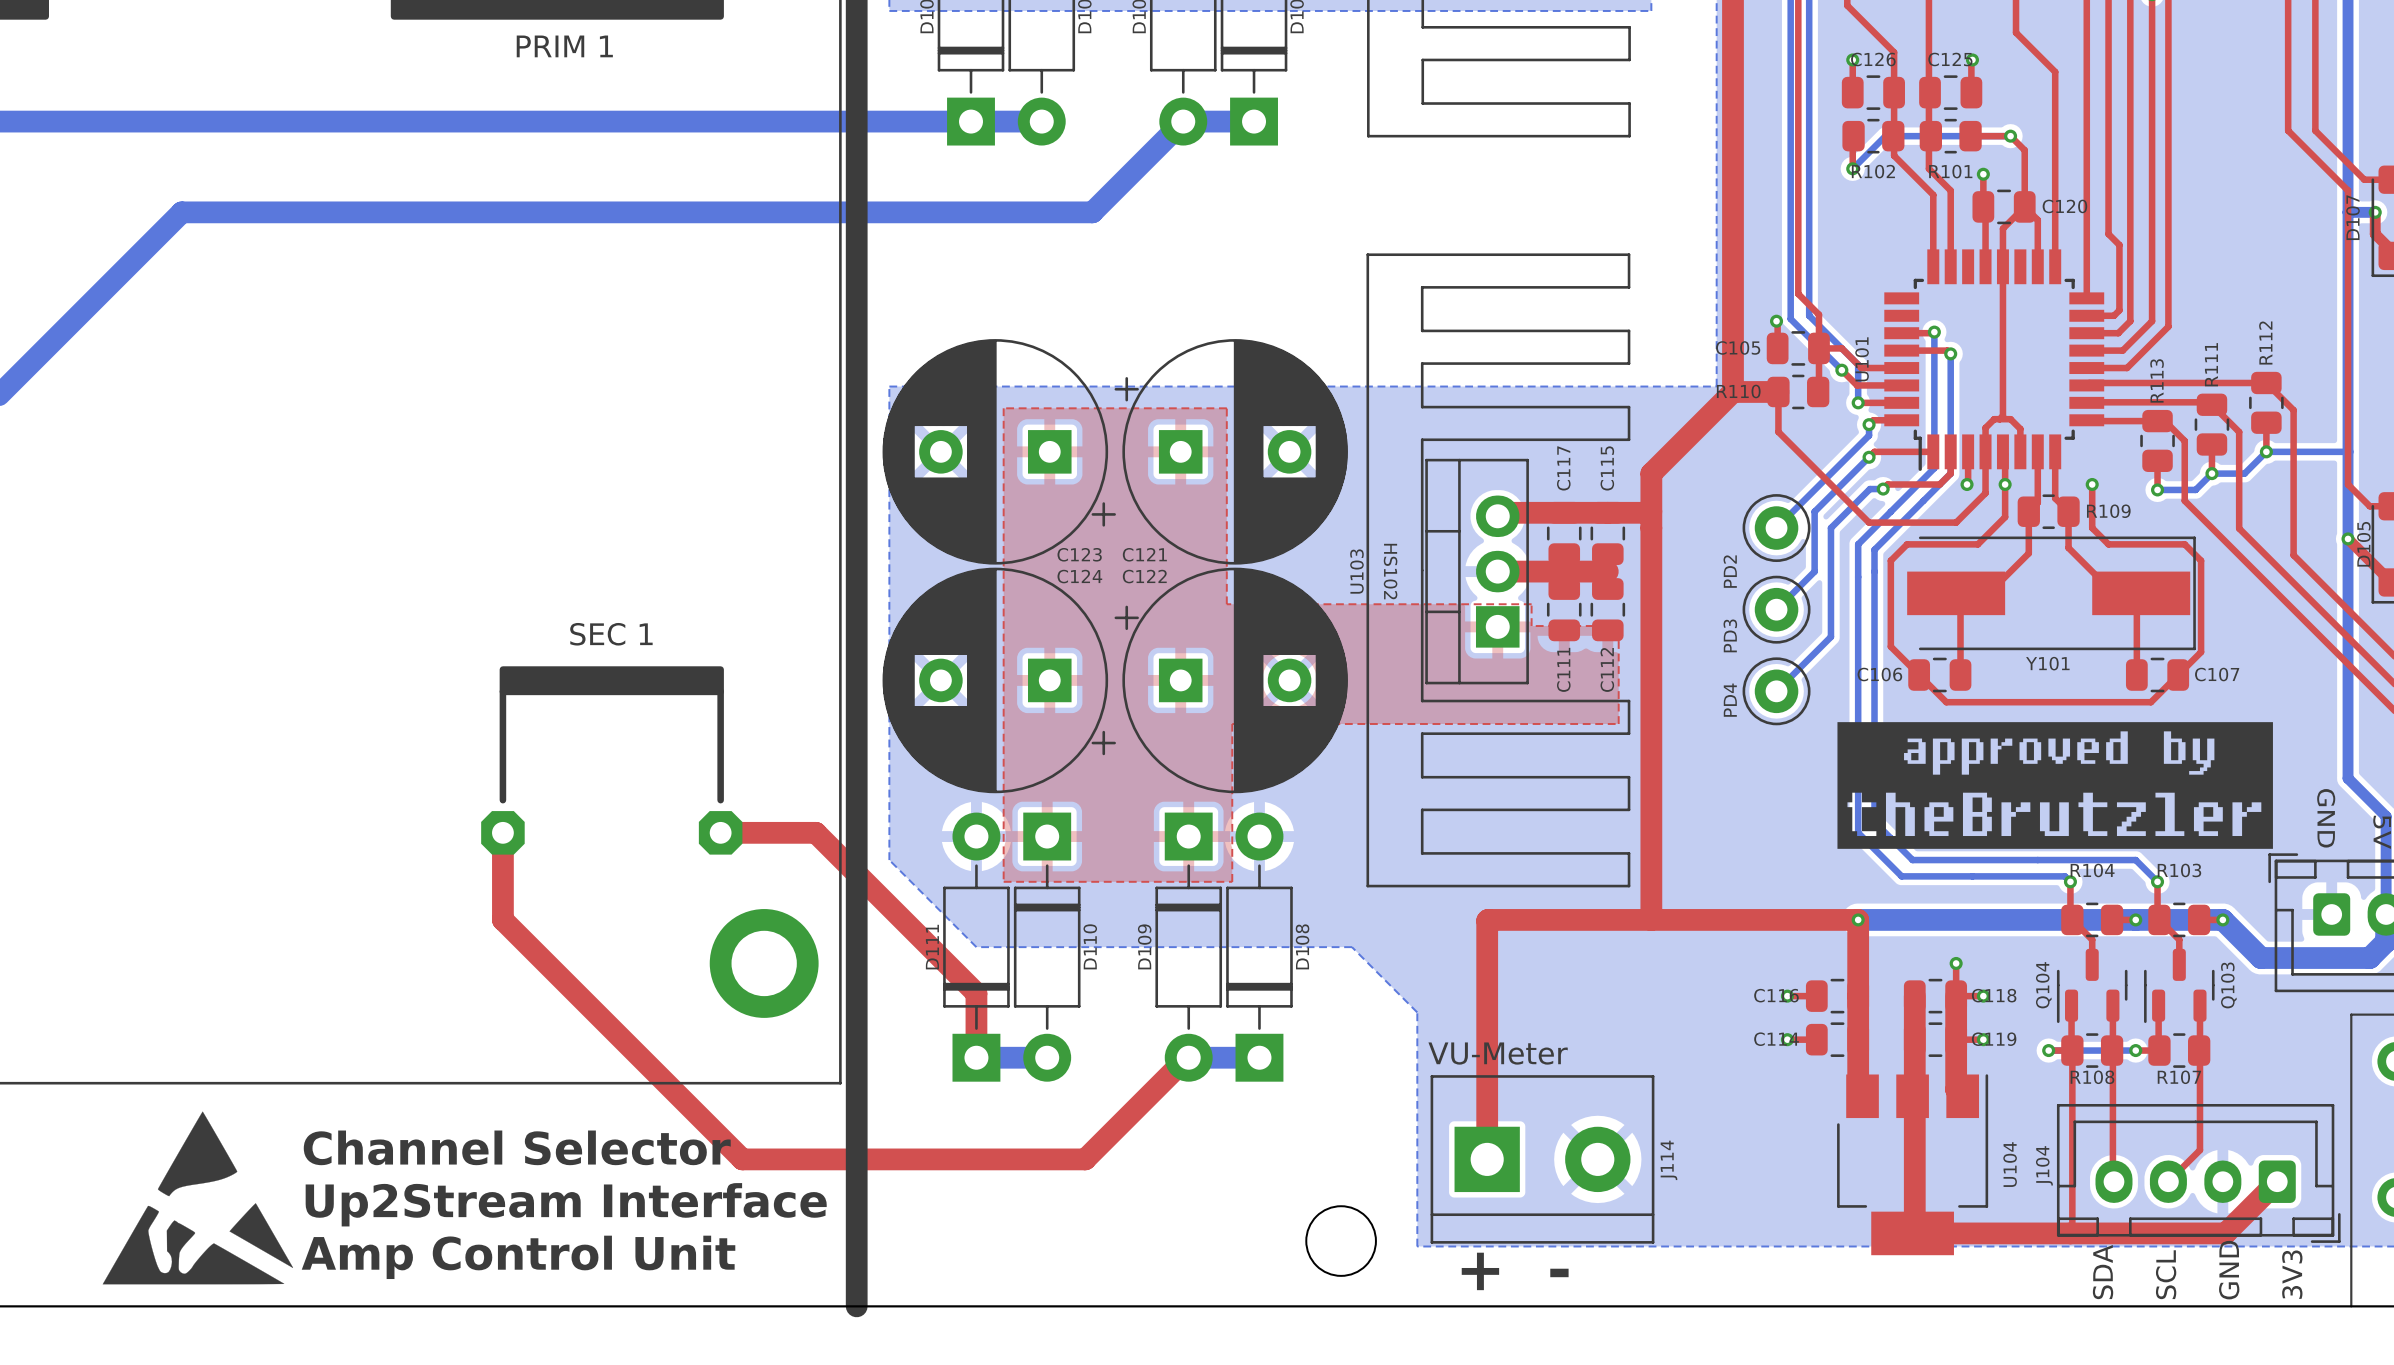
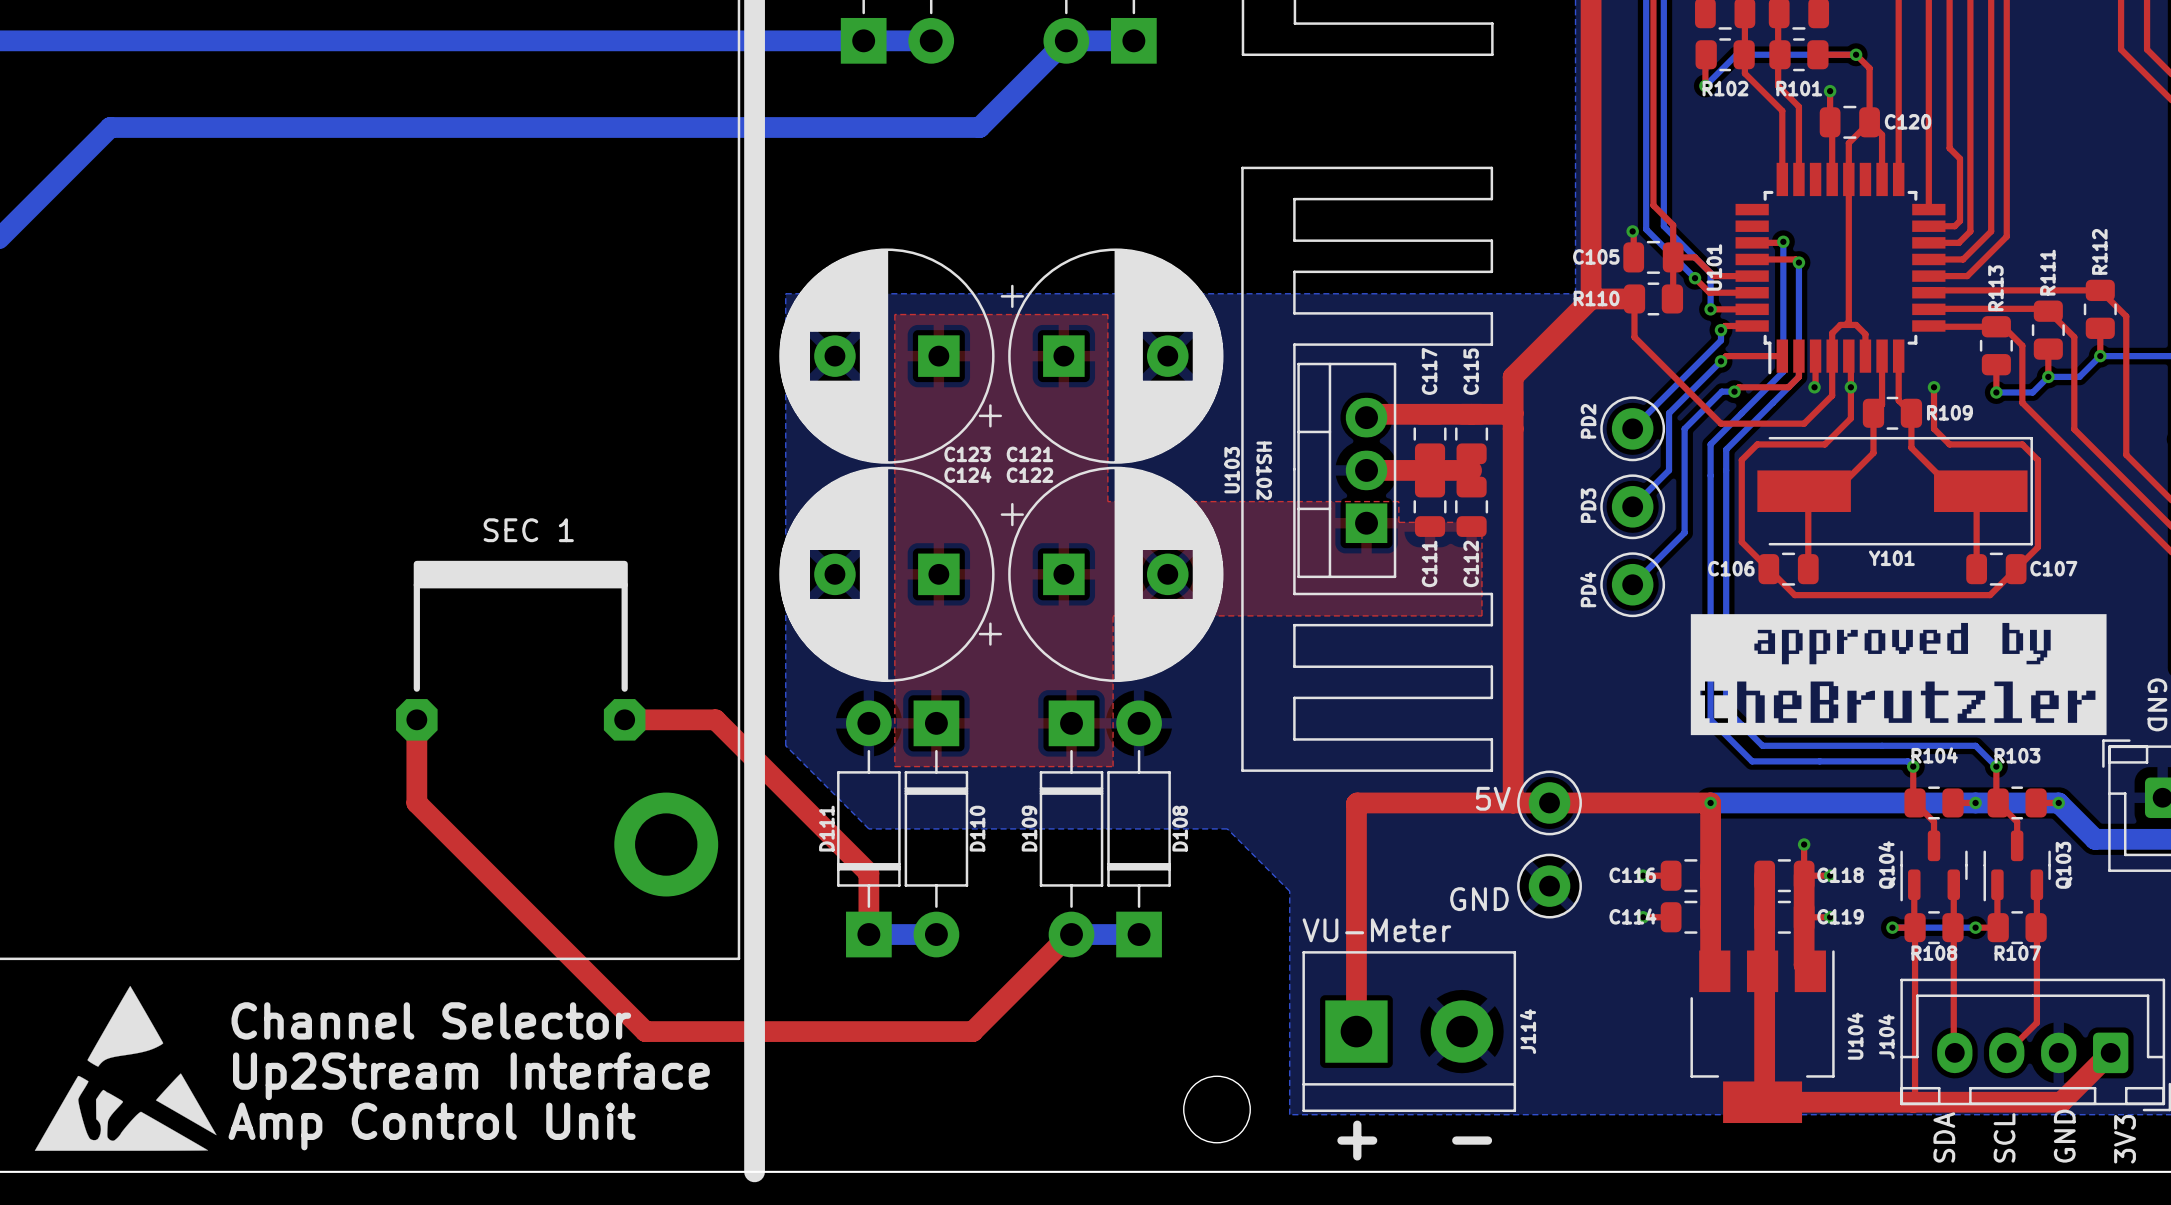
text: none -> 5V (1493, 798)
part: none -> (1549, 802)
part: none -> (1549, 886)
text: none -> GND (1479, 899)

